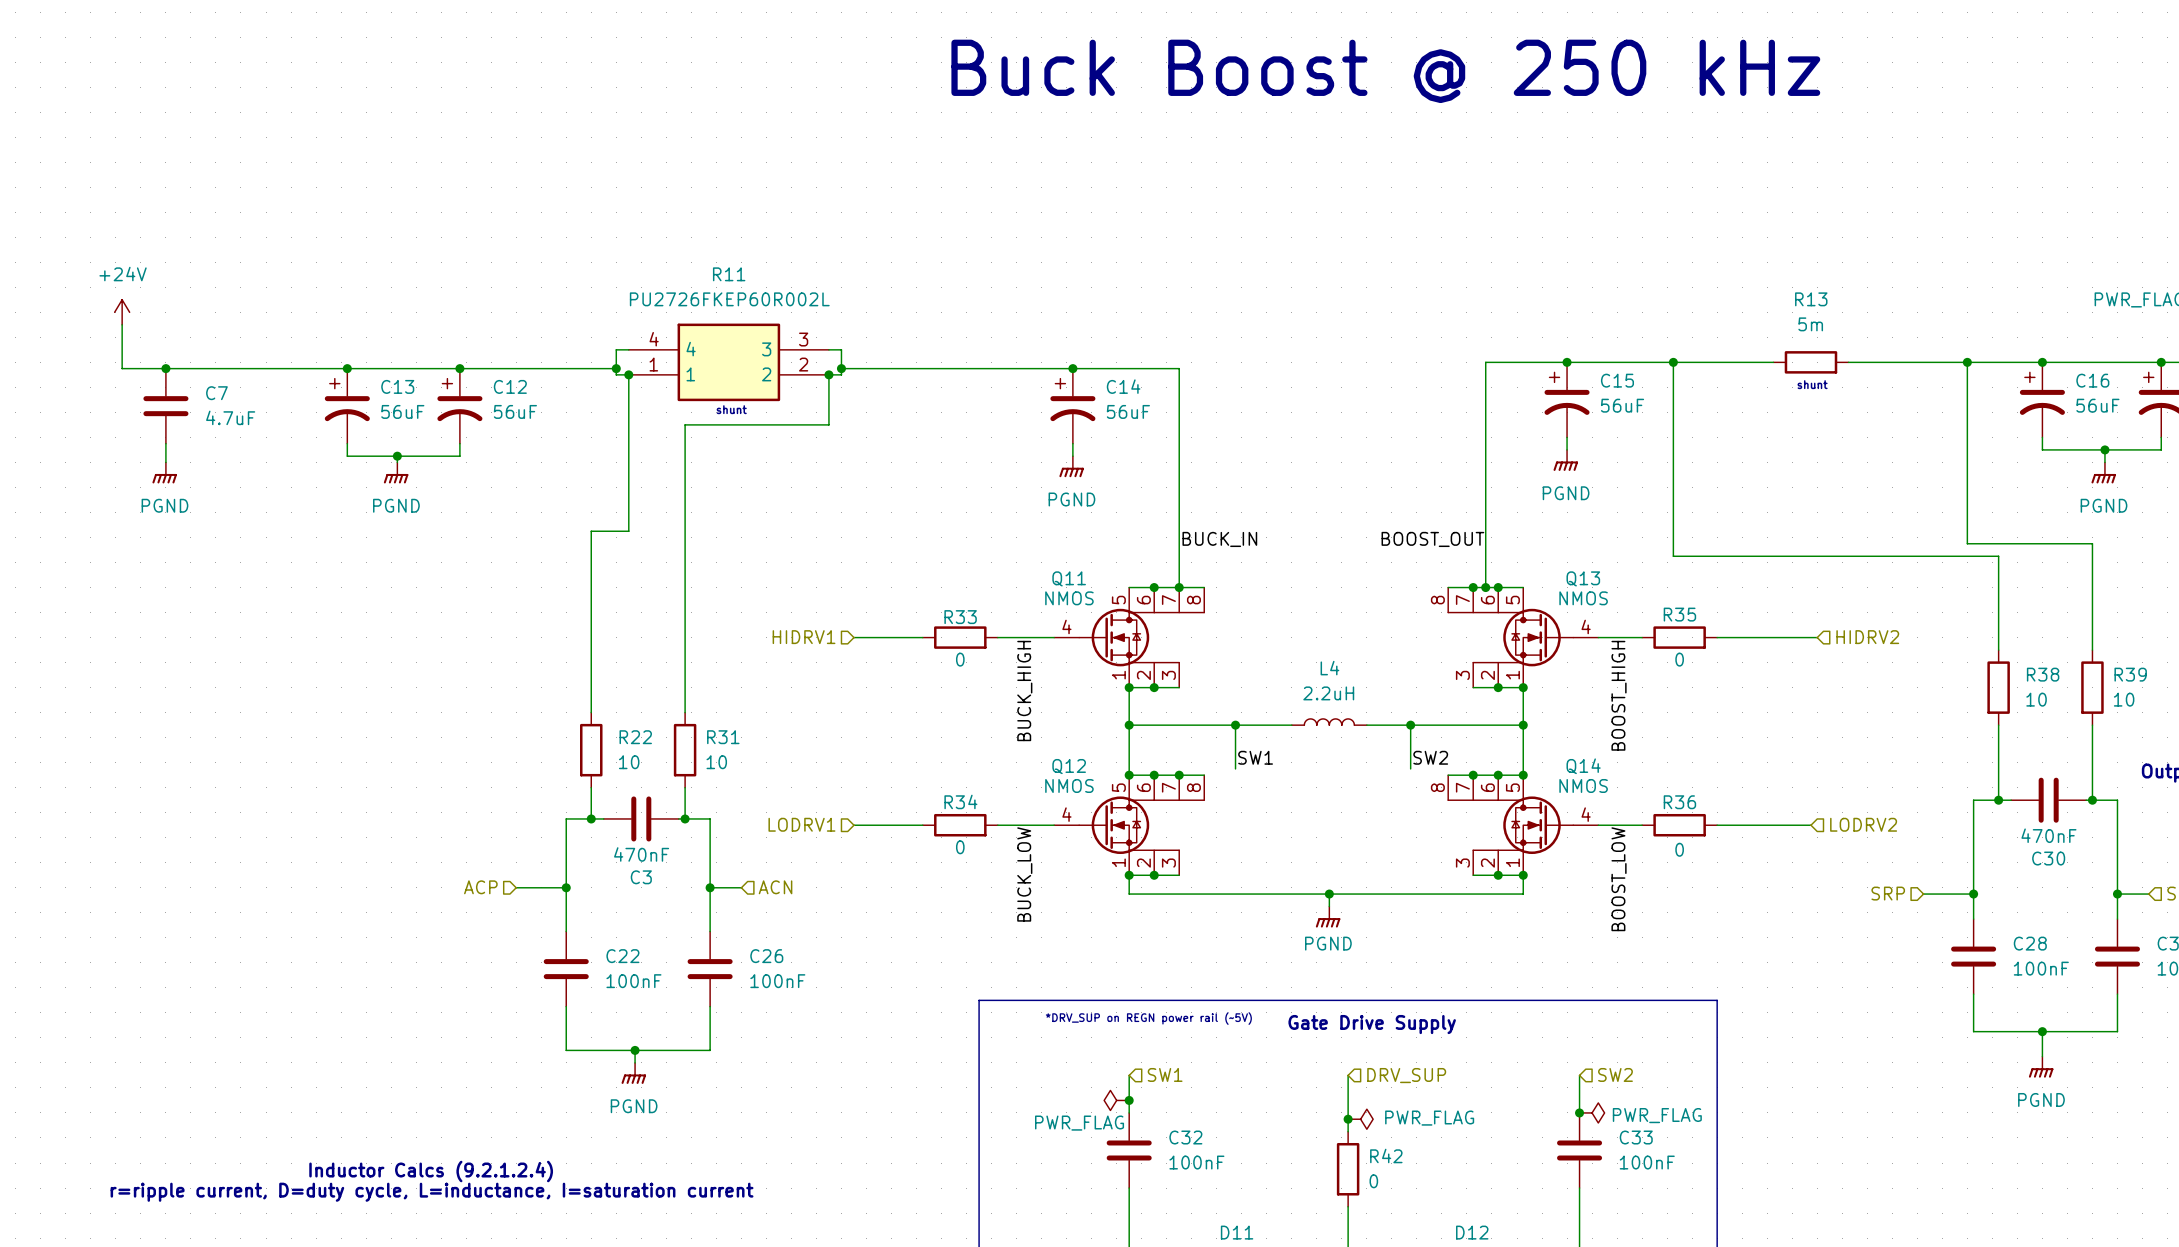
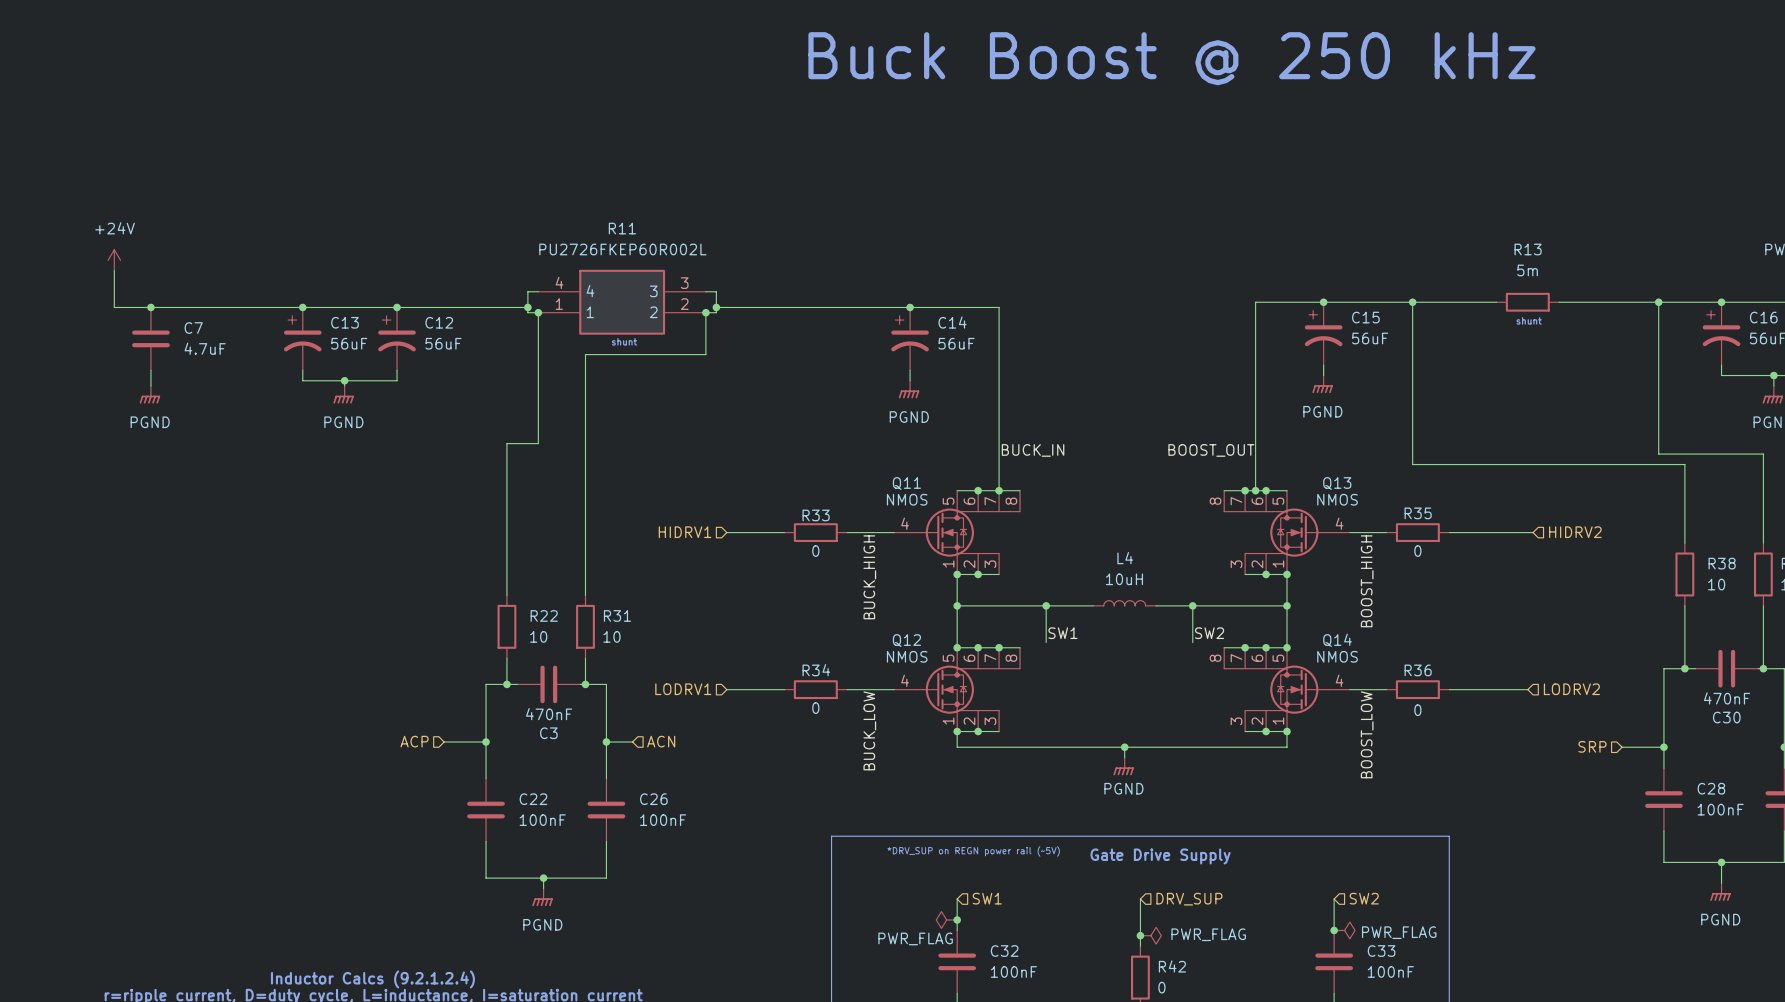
L4 value: 2.2uH (1328, 693) -> 10uH (1124, 579)

